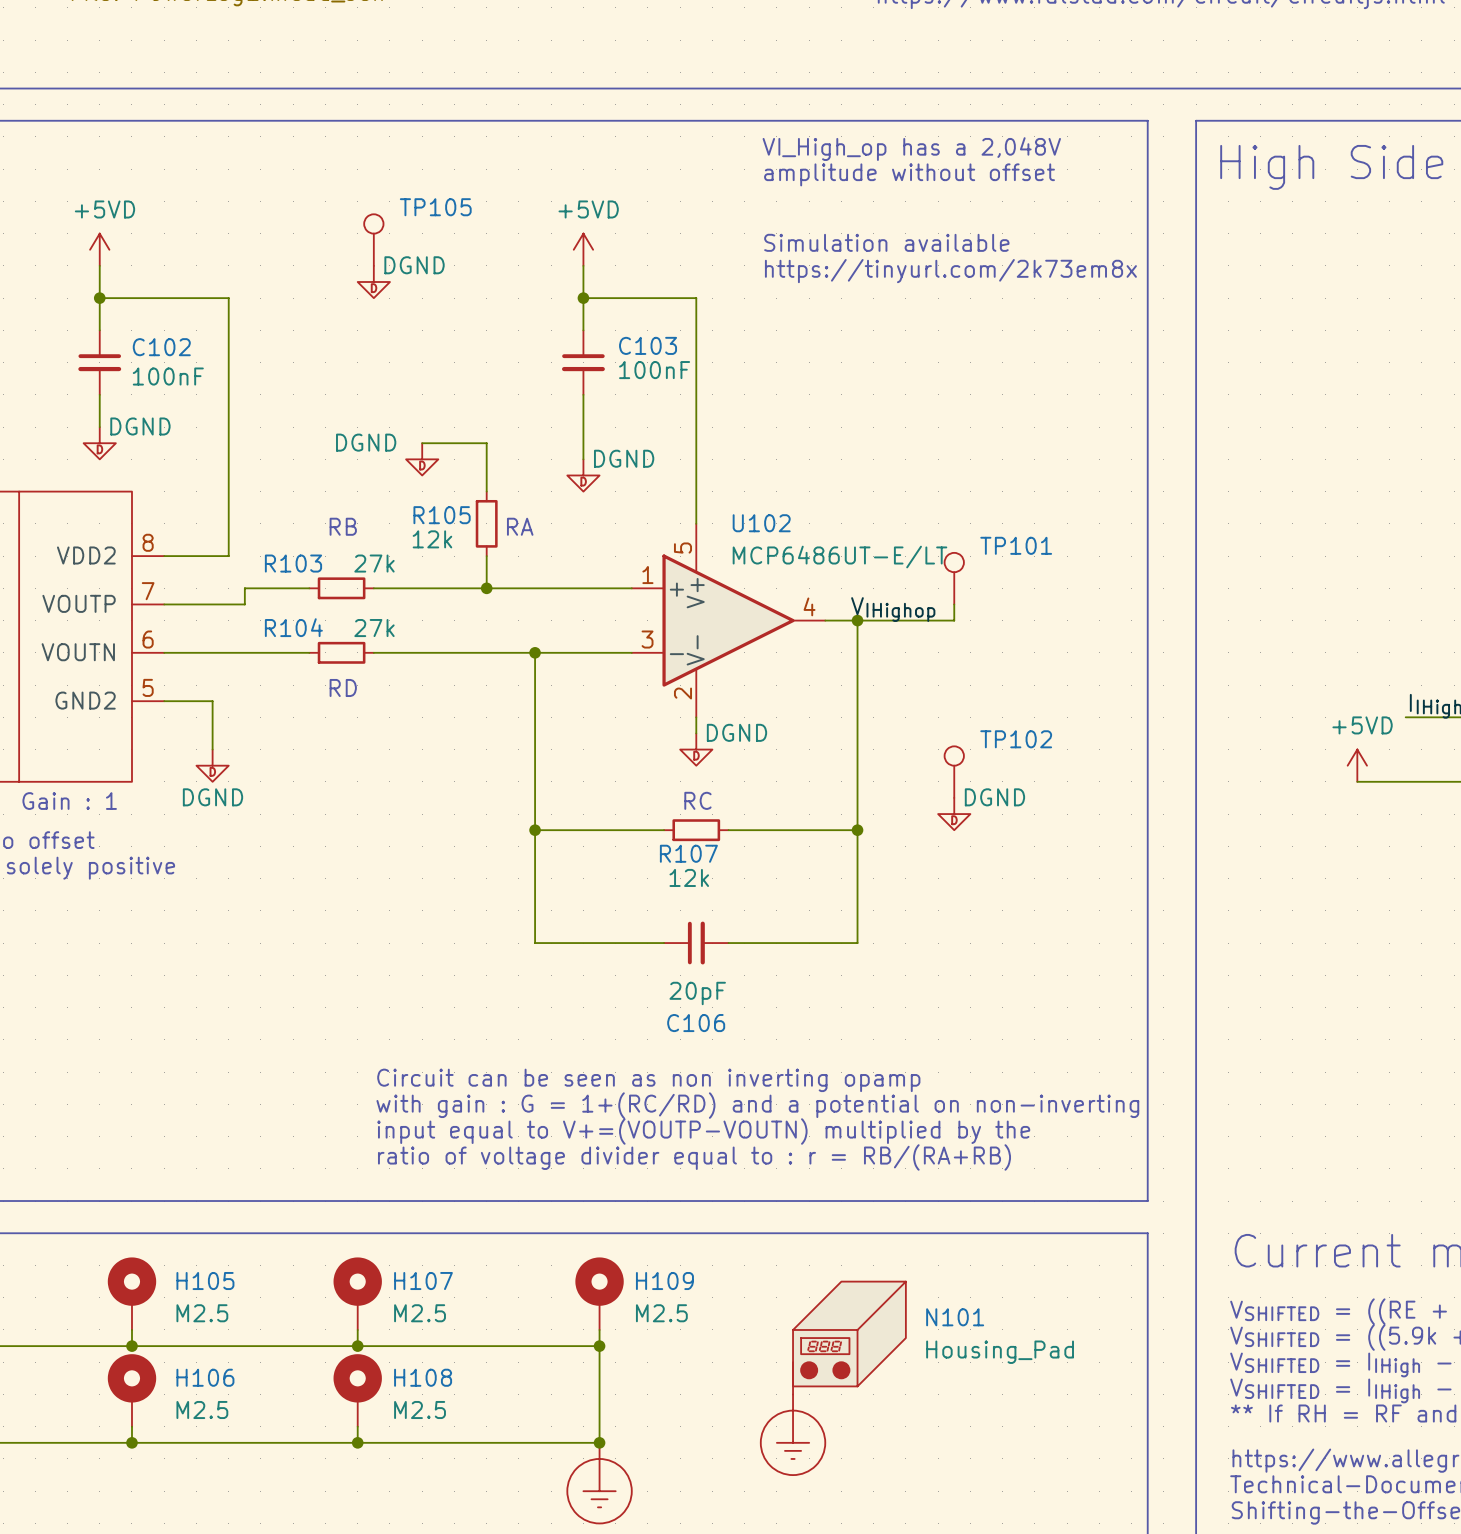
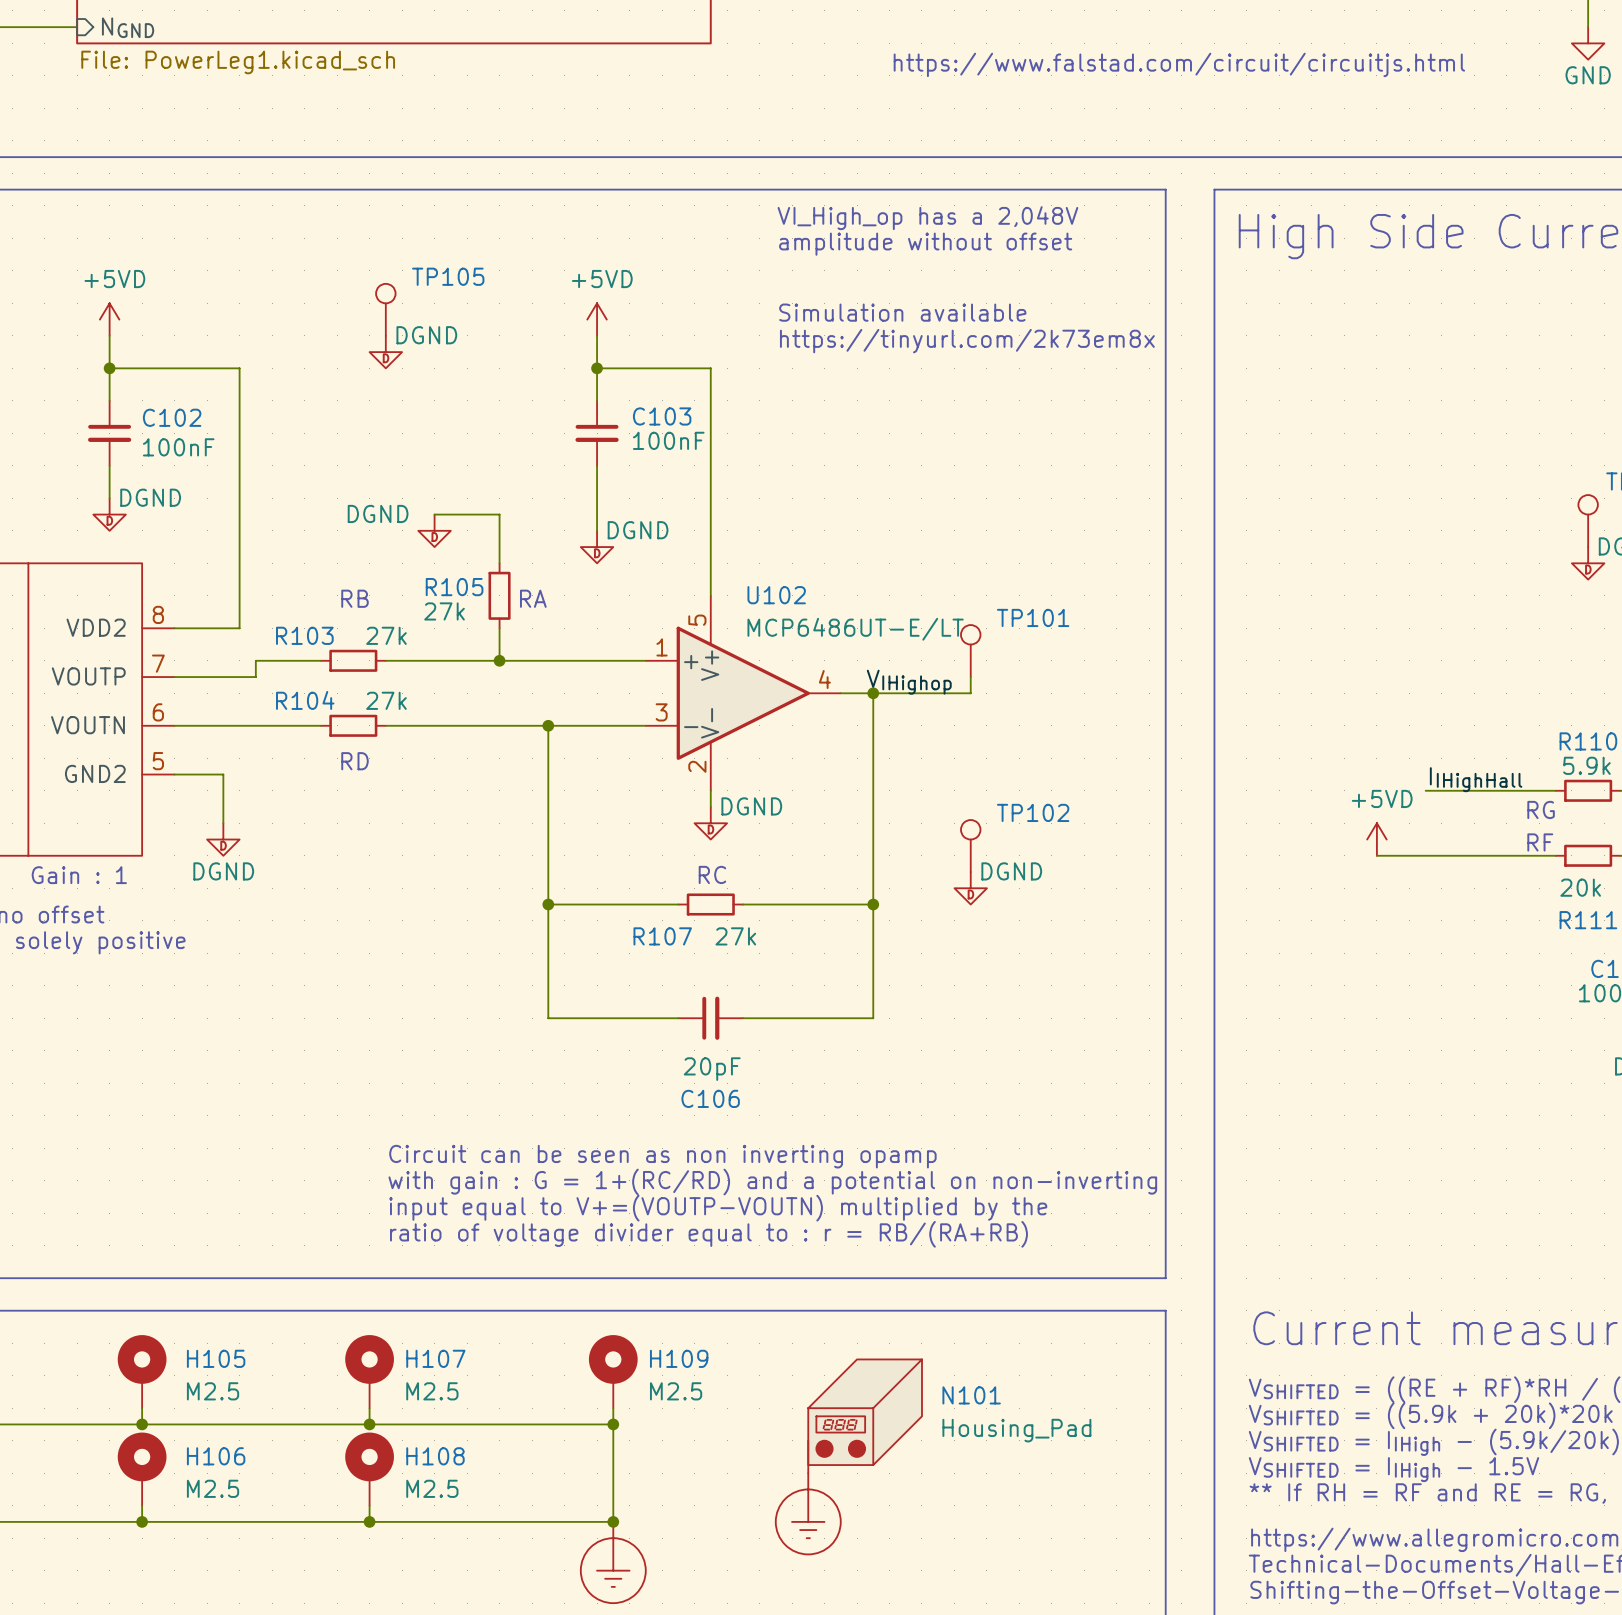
R105 value: 12k (432, 539) -> 27k (444, 611)
R107 name position: R107 (688, 853) -> R107 (662, 936)
R107 value: 12k (689, 877) -> 27k (735, 936)

